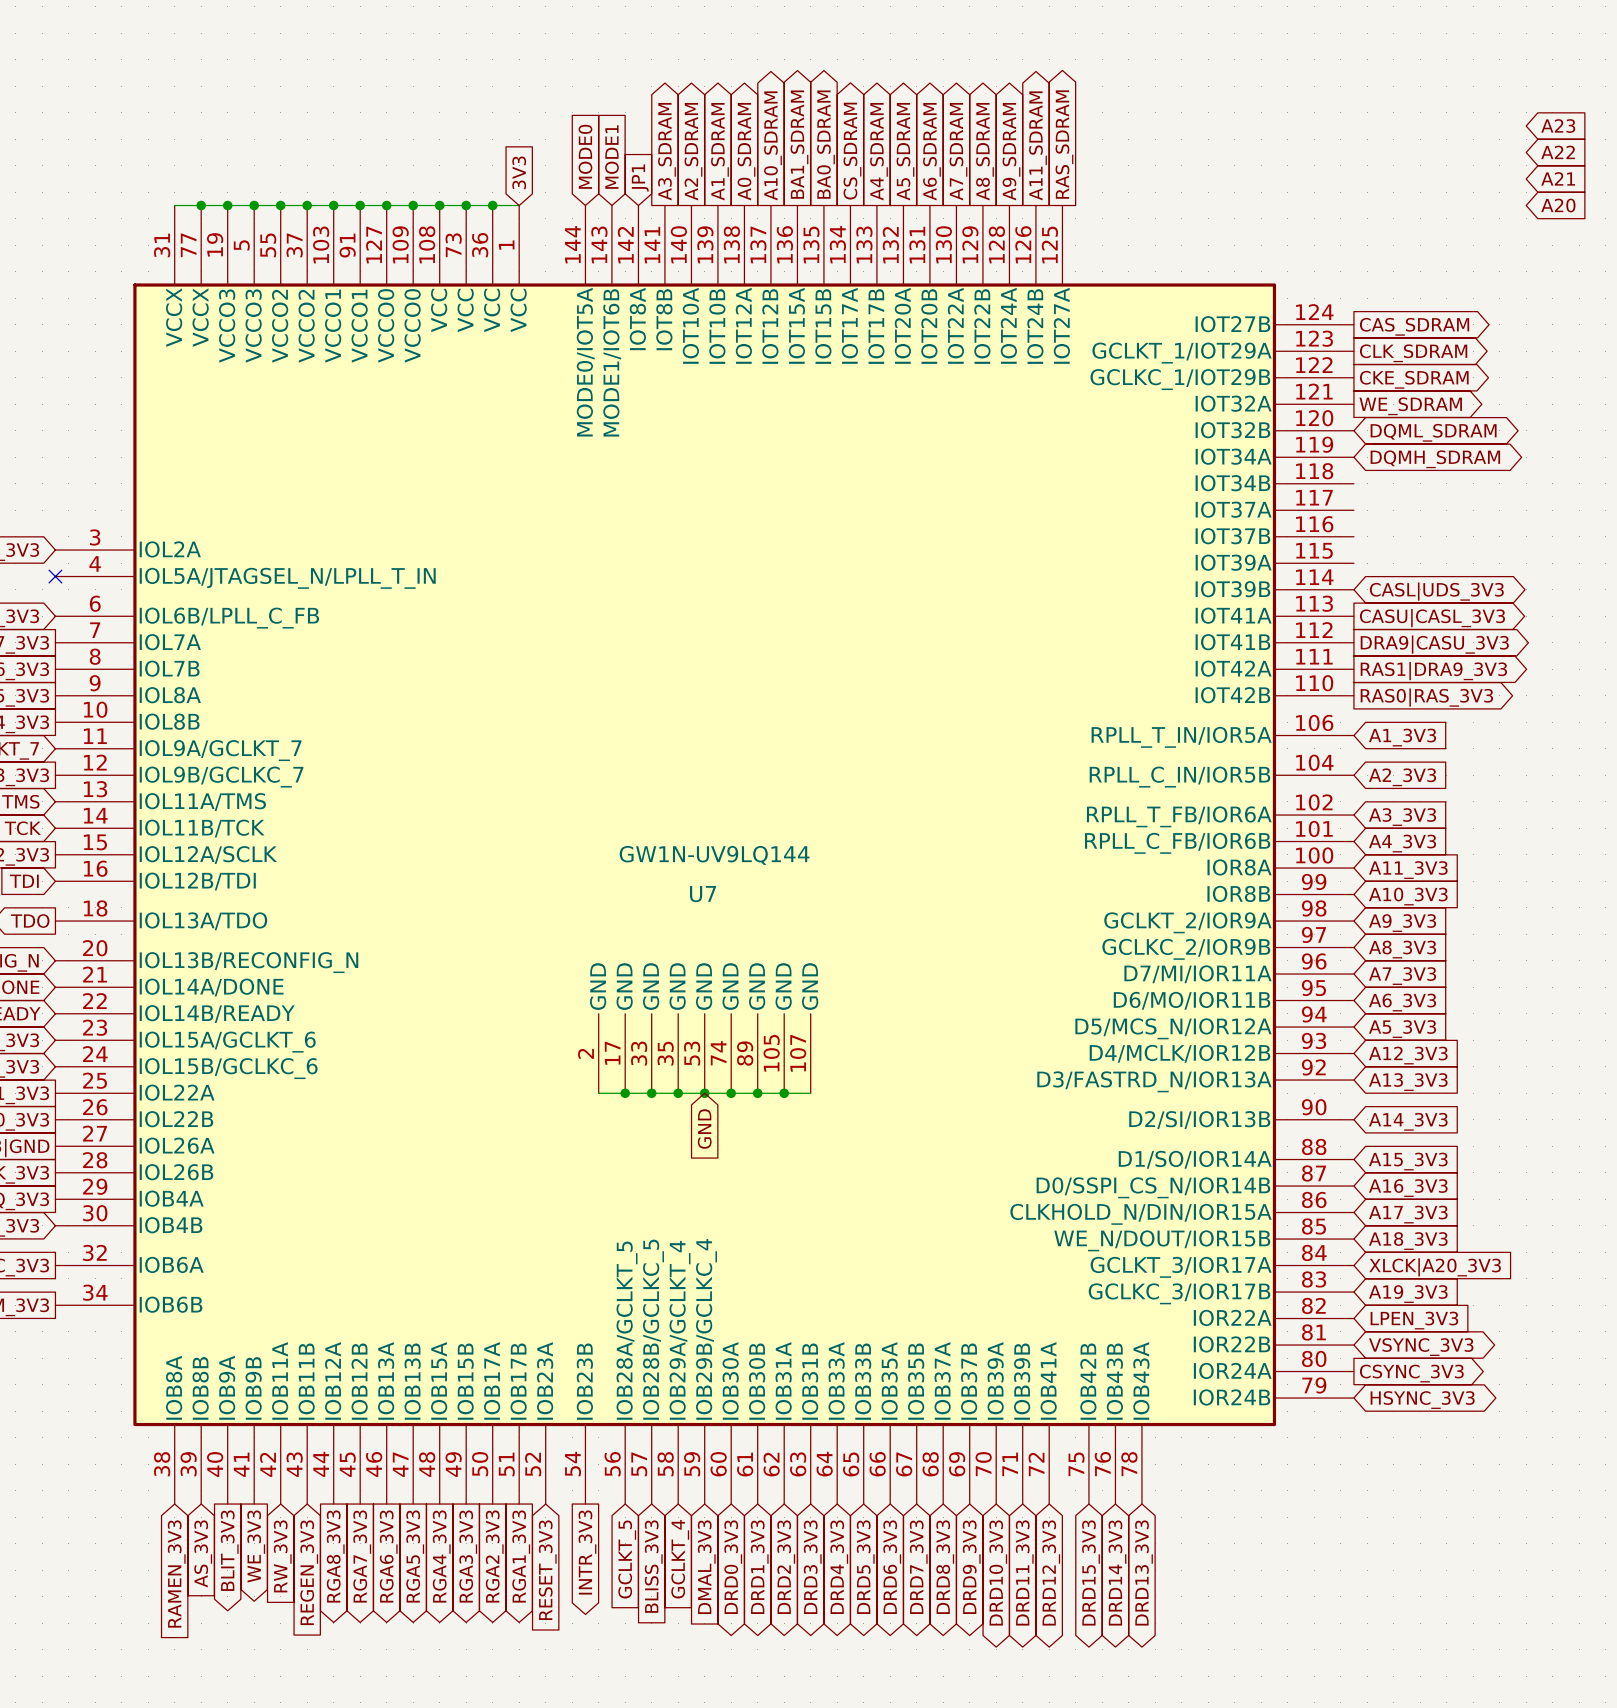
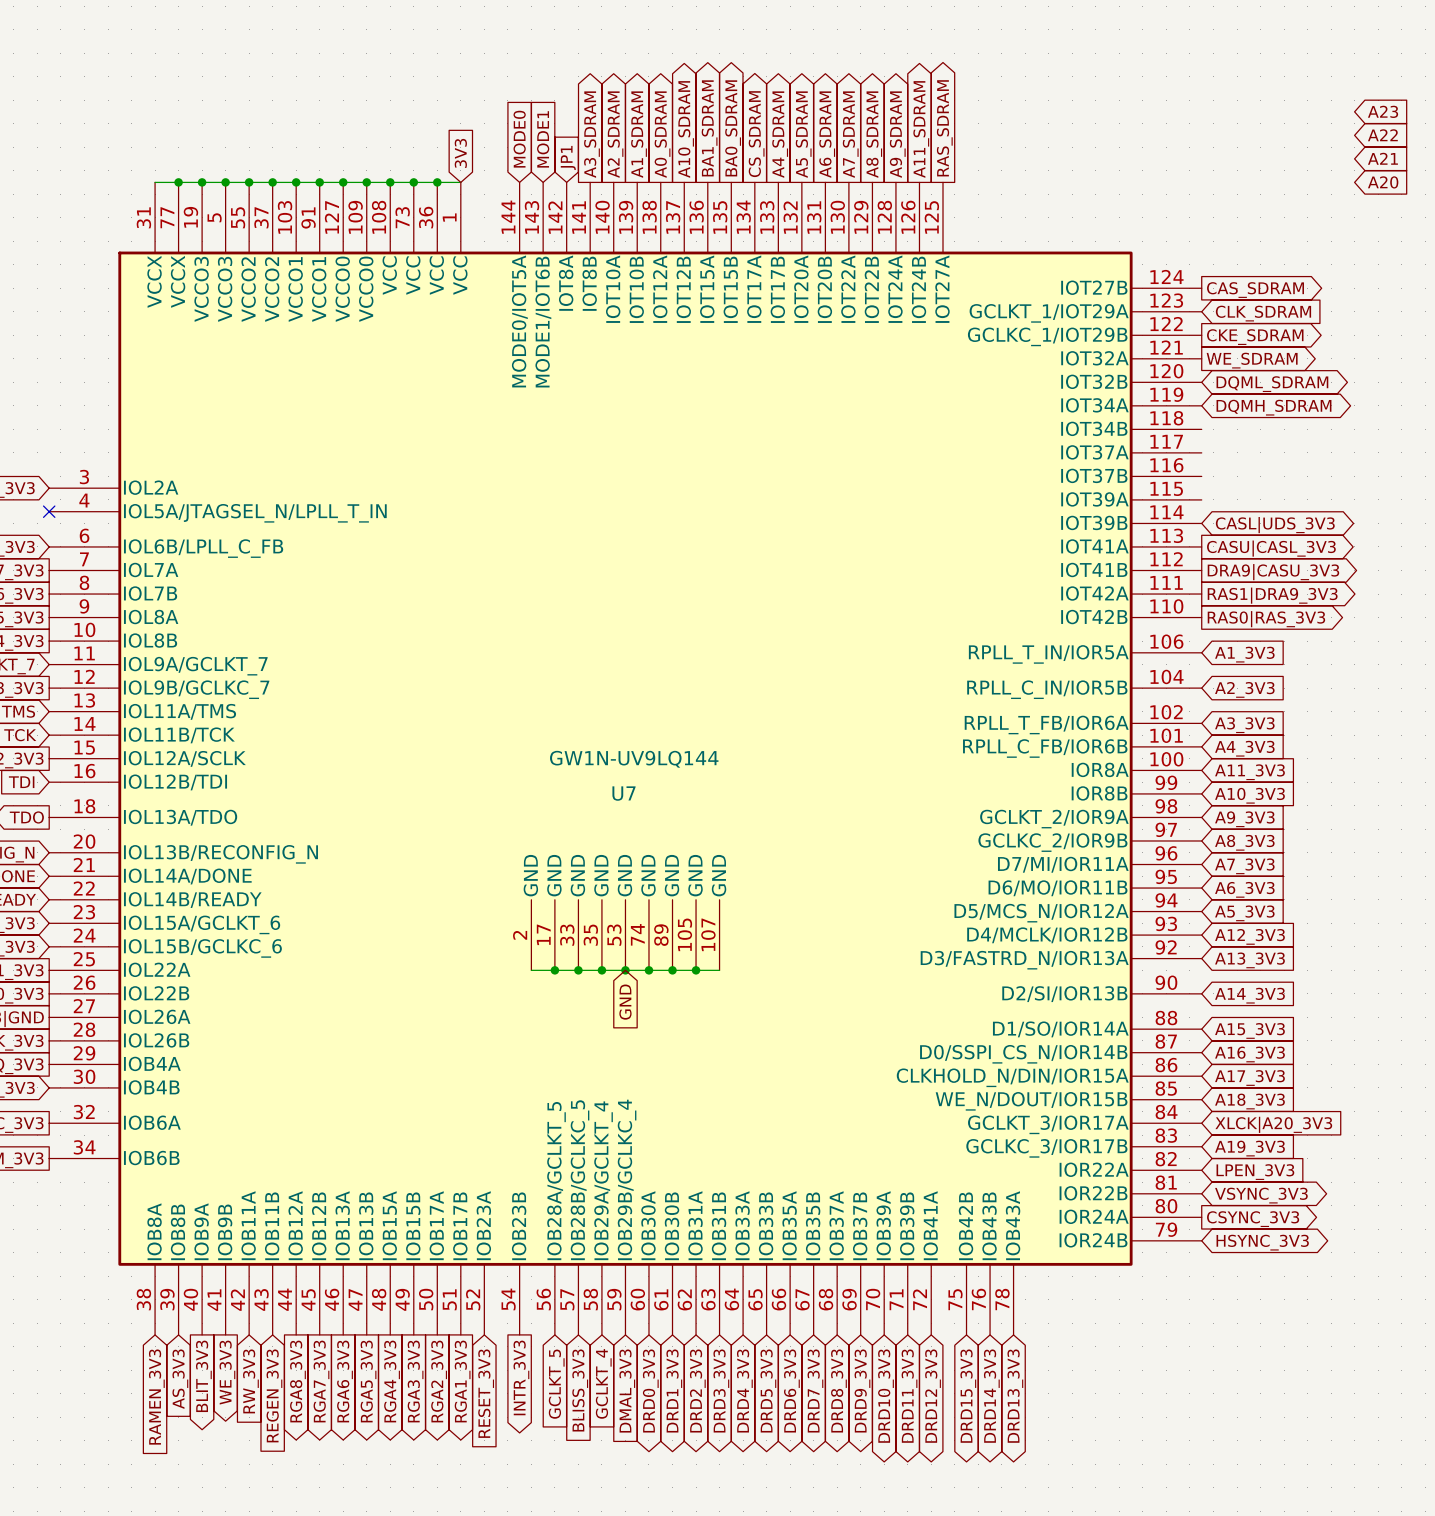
global label shape: output (1413, 353) -> input (1263, 313)

